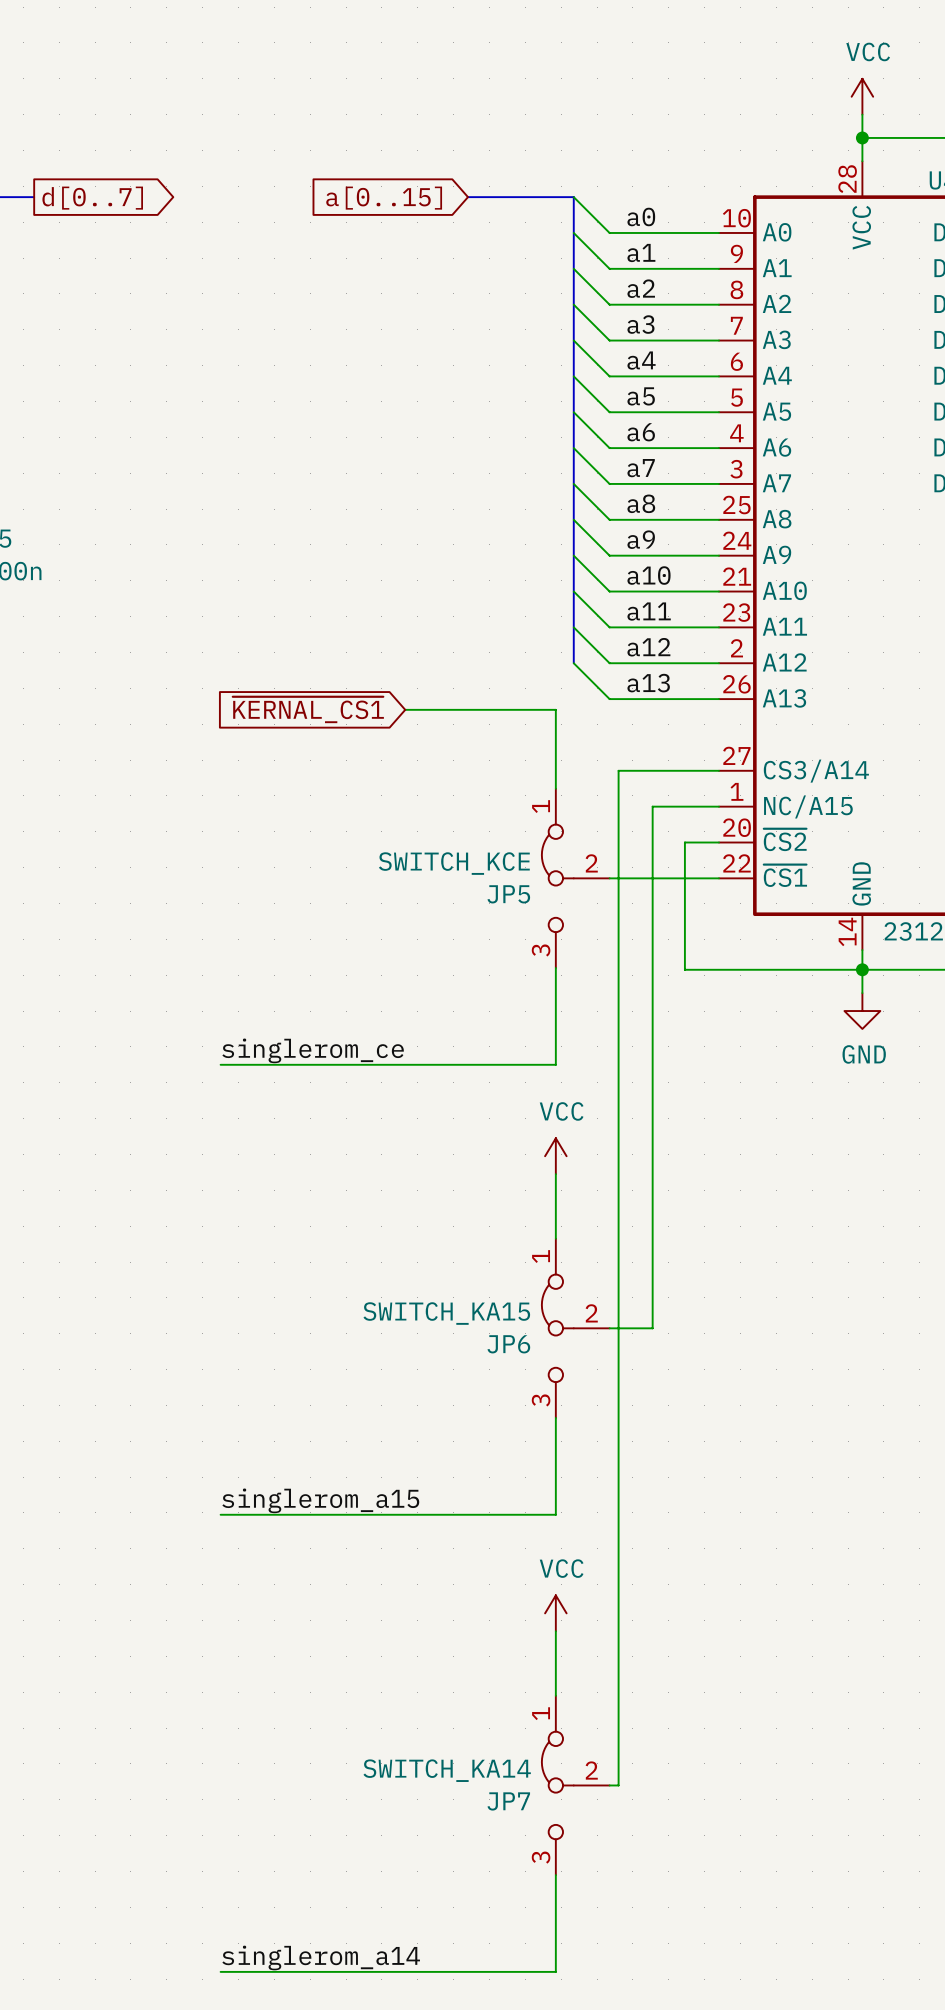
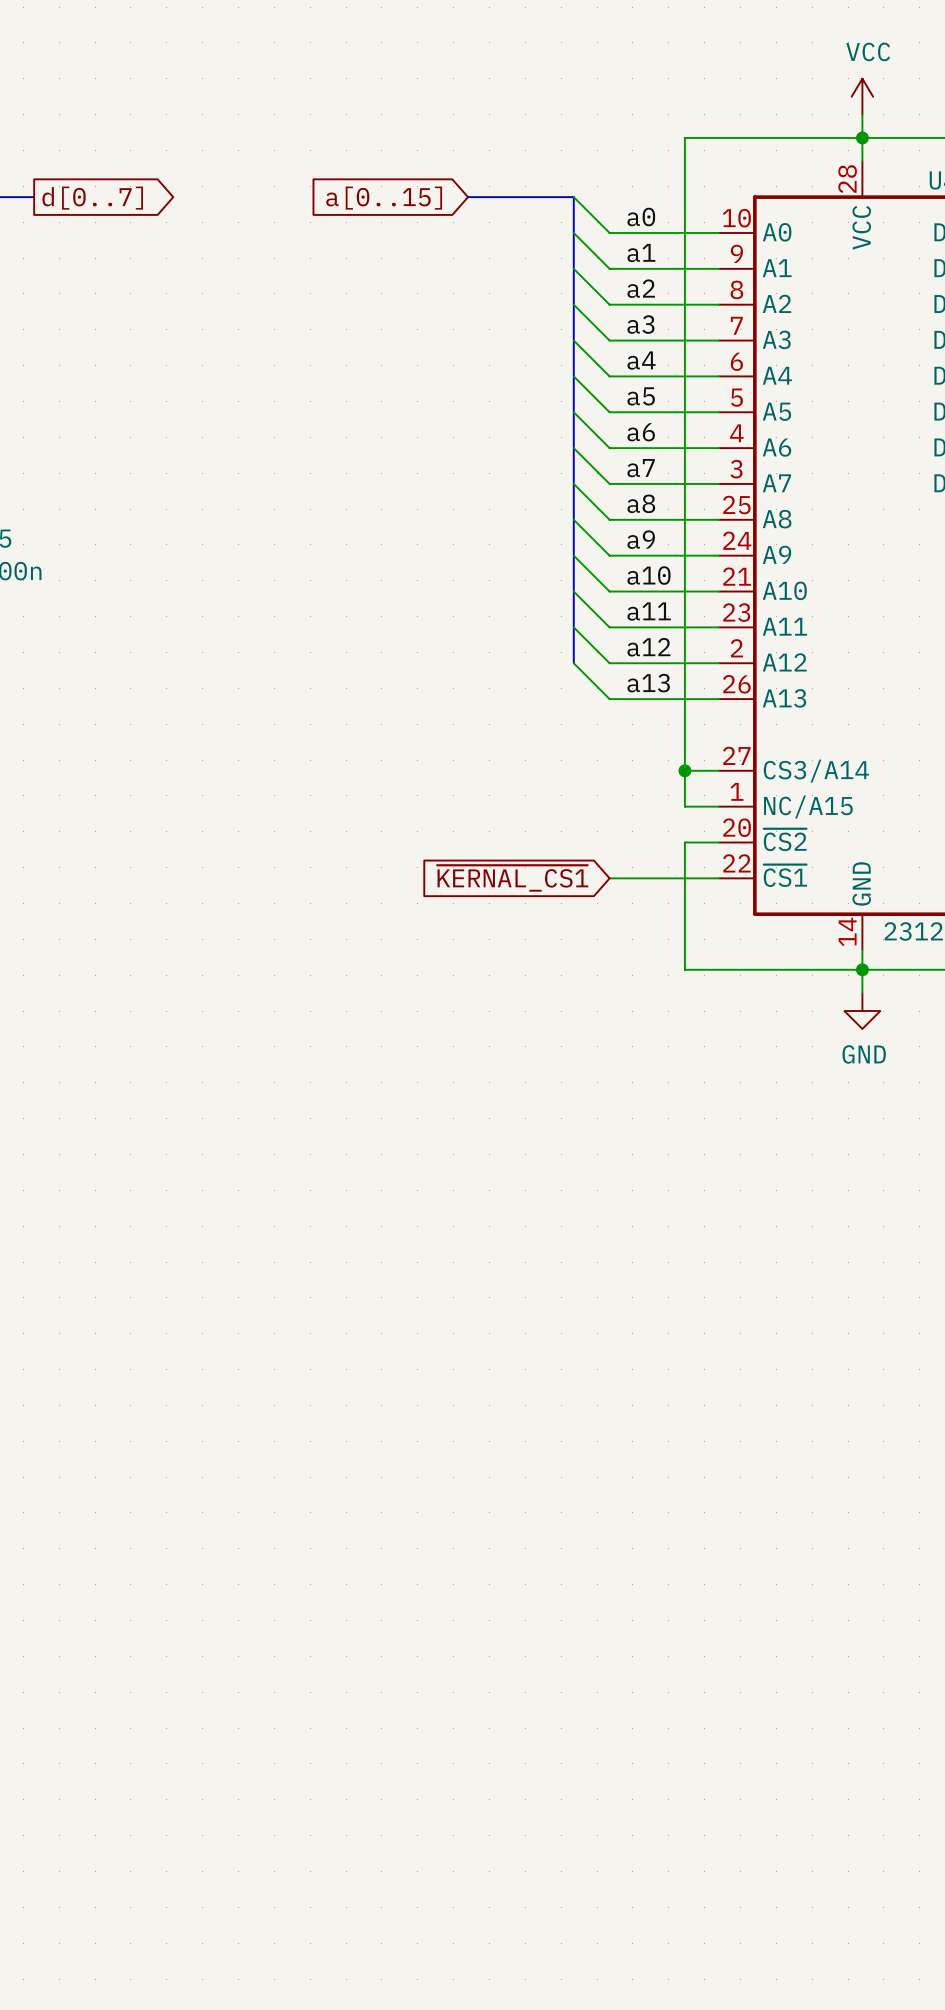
global label position: ~{KERNAL_CS1} (308, 709) -> ~{KERNAL_CS1} (512, 878)
wire: (405, 709) (555, 709) (555, 788) -> none
wire: (684, 770) (618, 770) (618, 1785) (609, 1785) -> none
junction: none -> (684, 770)
wire: (684, 806) (652, 806) (652, 1328) (609, 1328) -> (684, 806) (684, 137) (862, 137)
JP5: SWITCH_KCE (575, 878) -> none
wire: (555, 967) (555, 1064) (220, 1064) -> none
label: singlerom_ce (313, 1050) -> none
power symbol: VCC (555, 1156) -> none
wire: (555, 1174) (555, 1238) -> none
JP6: SWITCH_KA15 (575, 1328) -> none
wire: (555, 1417) (555, 1514) (220, 1514) -> none
label: singlerom_a15 (320, 1500) -> none
power symbol: VCC (555, 1613) -> none
wire: (555, 1631) (555, 1695) -> none
JP7: SWITCH_KA14 (575, 1785) -> none
wire: (555, 1875) (555, 1971) (220, 1971) -> none
label: singlerom_a14 (321, 1957) -> none

